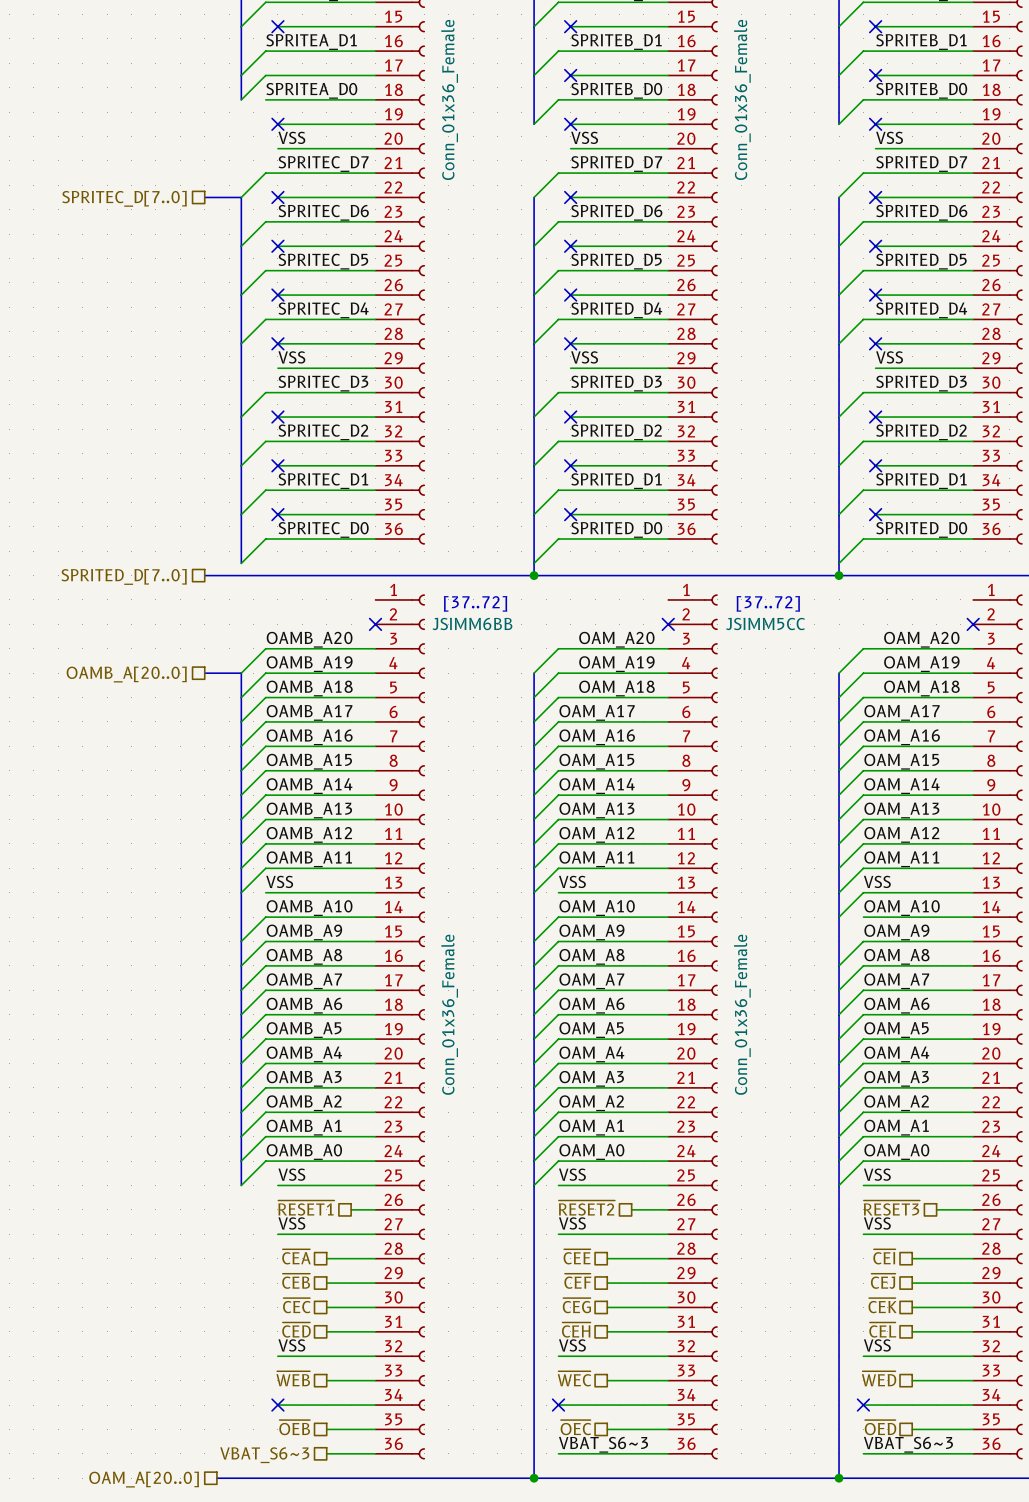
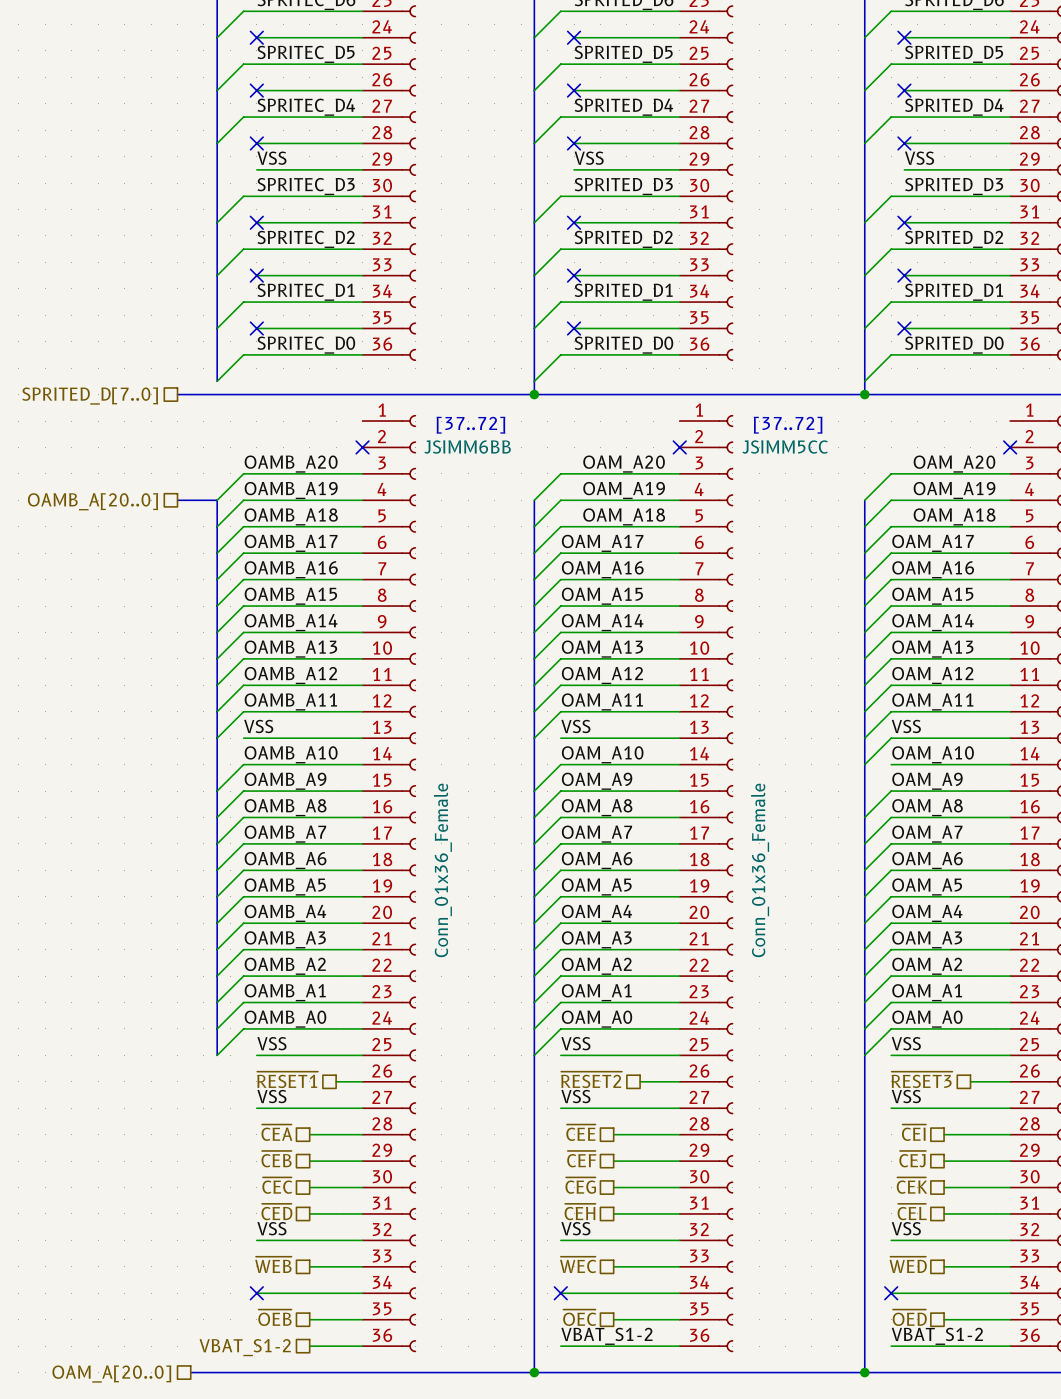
label: VBAT_S6~3 (603, 1444) -> VBAT_S1-2 (606, 1336)
label: VBAT_S6~3 (908, 1444) -> VBAT_S1-2 (937, 1336)
hierarchical label: VBAT_S6~3 (264, 1455) -> VBAT_S1-2 (245, 1347)

